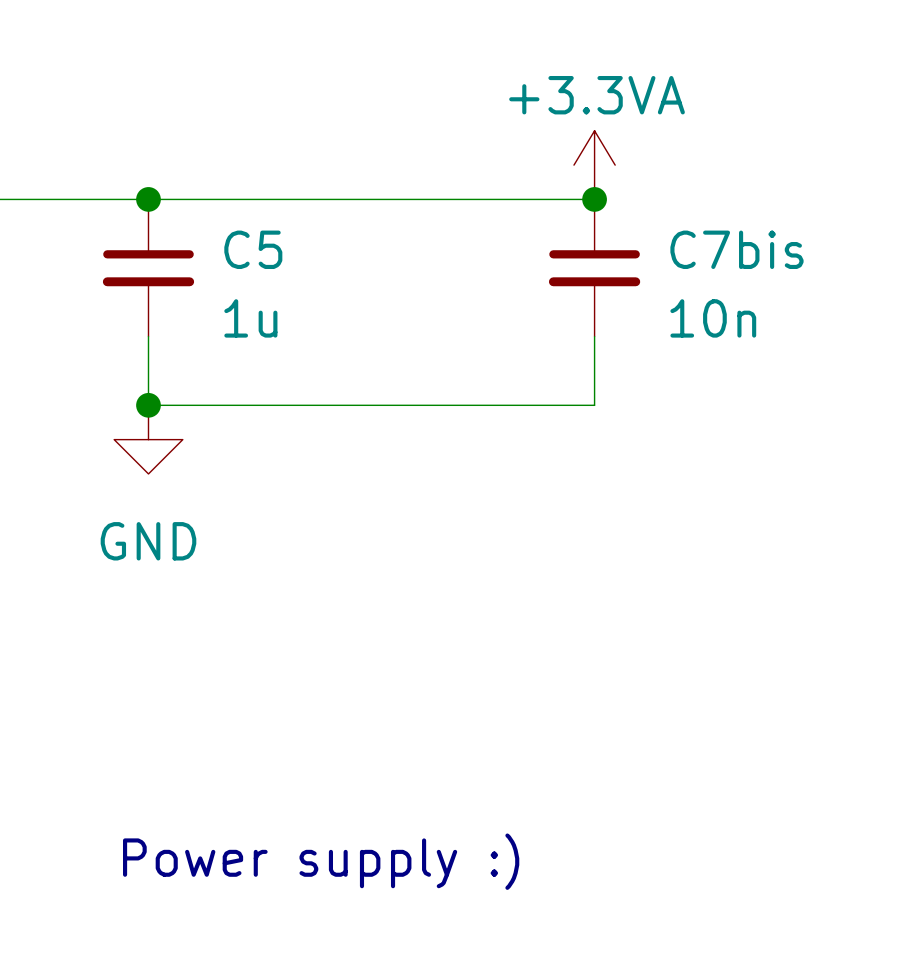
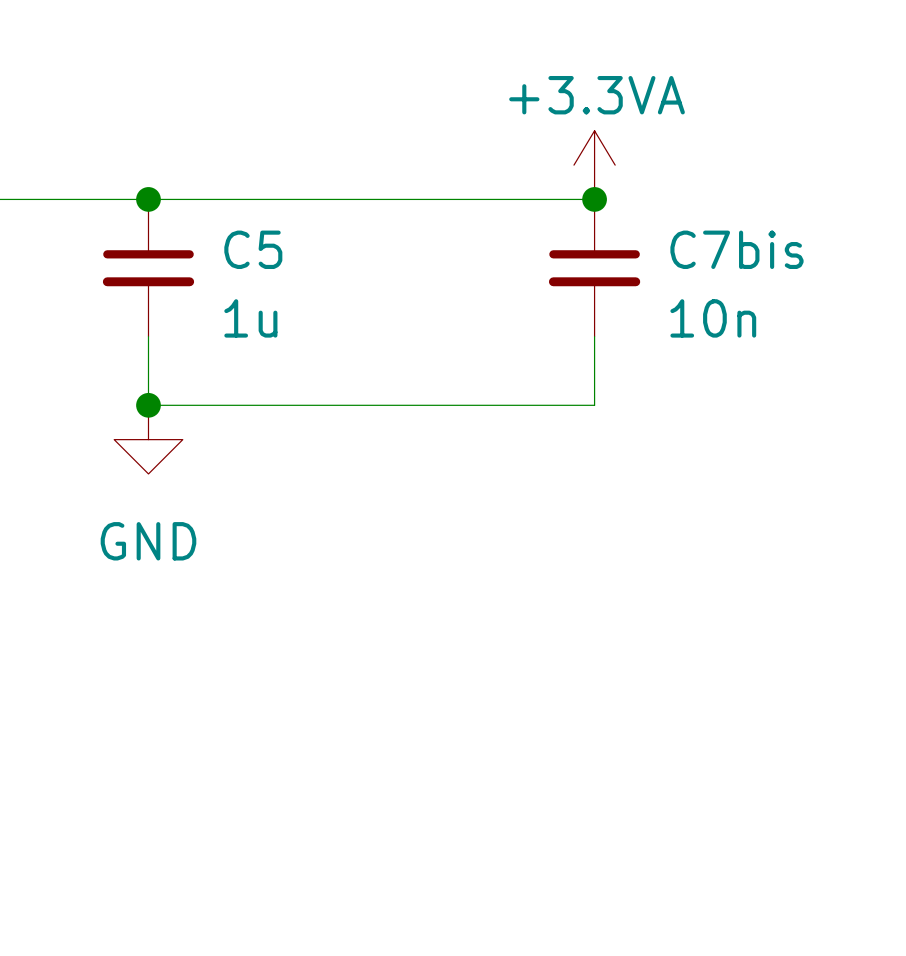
text: Power supply :) (321, 861) -> none

